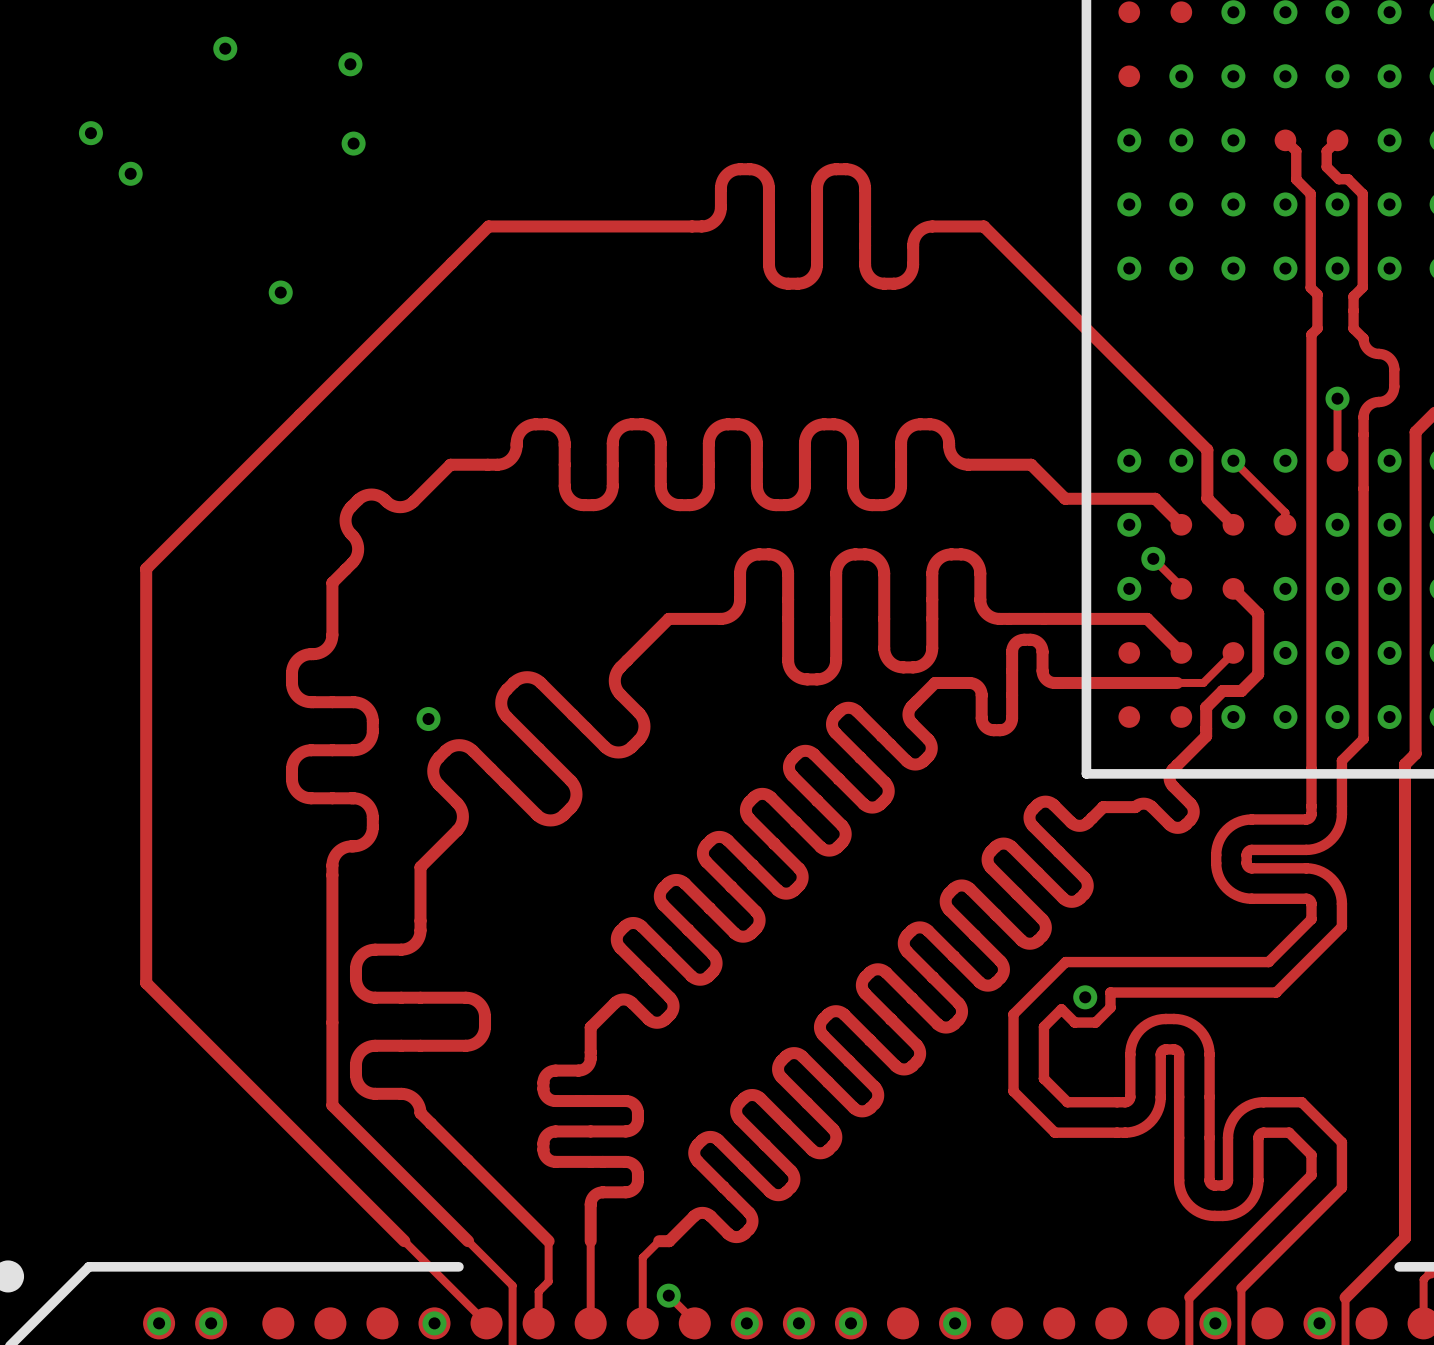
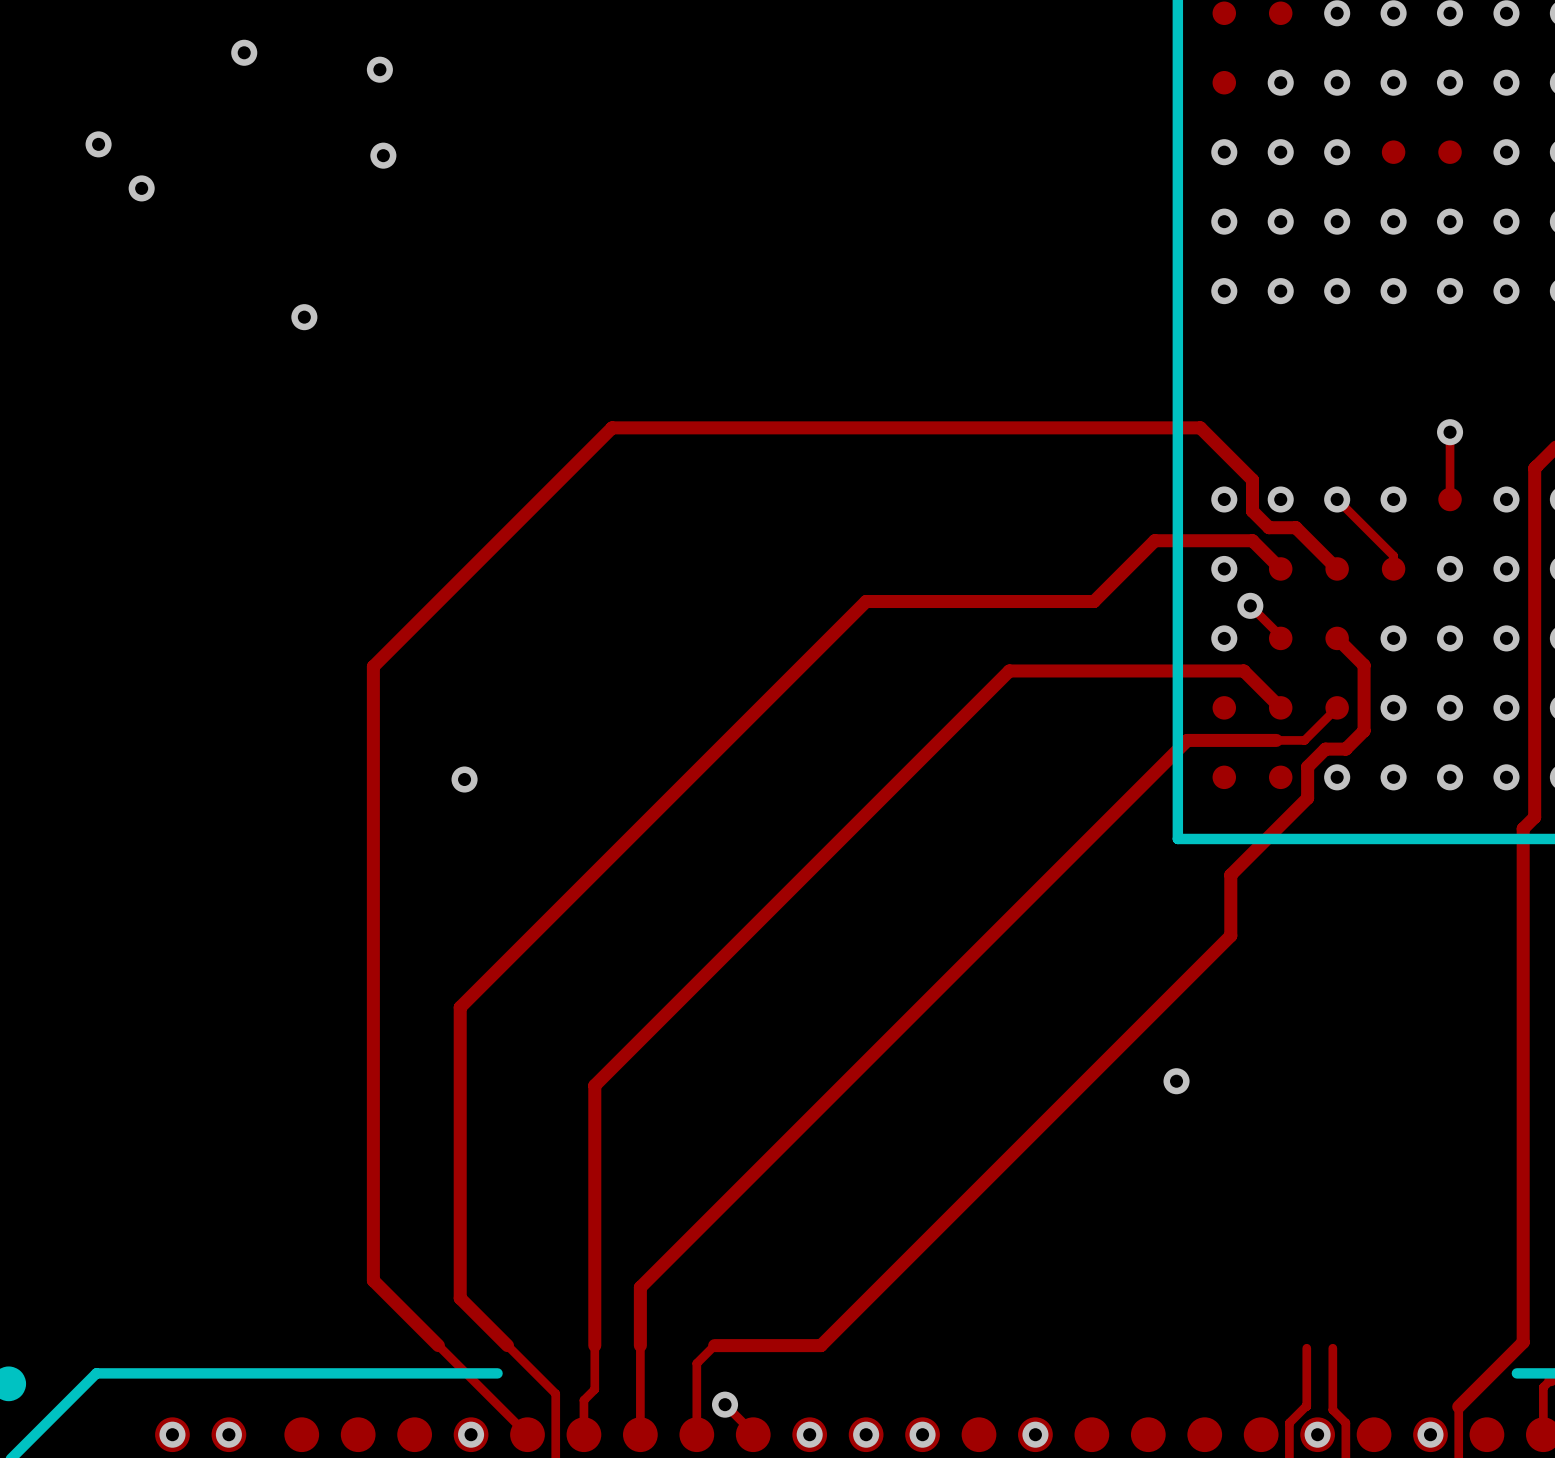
track: (1285, 140) (1296, 151) (1296, 179) (1310, 193) (1310, 287) (1317, 294) (1317, 328) (1311, 334) (1311, 814) (1306, 819) (1251, 819) (1236, 823) (1226, 829) (1219, 839) (1216, 851) (1216, 863) (1219, 878) (1232, 893) (1247, 898) (1308, 899) (1311, 902) (1311, 919) (1268, 962) (1065, 962) (1013, 1014) (1013, 1091) (1054, 1132) (1129, 1132) (1144, 1127) (1152, 1119) (1159, 1104) (1161, 1052) (1165, 1049) (1177, 1050) (1179, 1184) (1186, 1202) (1199, 1212) (1210, 1215) (1230, 1215) (1241, 1210) (1250, 1202) (1258, 1184) (1258, 1137) (1261, 1133) (1289, 1132) (1311, 1155) (1311, 1175) (1189, 1297) (1189, 1312) -> (1305, 1406) (1289, 1423)
track: (1337, 140) (1326, 151) (1326, 166) (1338, 179) (1347, 179) (1362, 193) (1362, 287) (1353, 296) (1353, 328) (1363, 338) (1368, 349) (1388, 357) (1392, 361) (1394, 369) (1392, 394) (1384, 400) (1369, 405) (1363, 415) (1363, 739) (1341, 760) (1341, 818) (1338, 829) (1331, 839) (1321, 846) (1310, 849) (1250, 850) (1246, 853) (1246, 863) (1251, 868) (1310, 868) (1325, 873) (1334, 881) (1339, 892) (1341, 926) (1276, 992) (1110, 992) (1110, 1007) (1095, 1022) (1074, 1022) (1061, 1009) (1043, 1026) (1043, 1078) (1067, 1102) (1128, 1100) (1131, 1046) (1138, 1032) (1146, 1024) (1161, 1019) (1177, 1019) (1189, 1022) (1199, 1029) (1206, 1039) (1209, 1050) (1209, 1180) (1213, 1185) (1223, 1185) (1227, 1182) (1230, 1126) (1238, 1112) (1251, 1104) (1263, 1102) (1301, 1102) (1341, 1142) (1341, 1187) (1241, 1288) (1241, 1312) -> (1332, 1348) (1332, 1409) (1345, 1423)
track: (1065, 498) (1031, 464) (968, 464) (960, 462) (951, 453) (948, 437) (943, 429) (934, 424) (920, 424) (910, 427) (902, 437) (900, 488) (898, 496) (886, 504) (865, 504) (857, 497) (853, 490) (853, 443) (851, 435) (840, 425) (824, 424) (812, 428) (806, 437) (804, 488) (802, 496) (790, 504) (771, 504) (762, 499) (757, 490) (756, 443) (755, 435) (744, 425) (728, 424) (716, 428) (709, 437) (708, 488) (705, 496) (693, 504) (675, 504) (666, 499) (661, 490) (660, 443) (658, 435) (647, 425) (631, 424) (619, 428) (613, 437) (612, 488) (609, 496) (599, 504) (581, 505) (571, 500) (565, 490) (564, 441) (561, 433) (551, 425) (535, 424) (527, 426) (520, 431) (517, 439) (514, 453) (505, 462) (497, 464) (450, 464) (413, 501) (404, 506) (393, 506) (379, 496) (371, 494) (361, 497) (351, 506) (346, 514) (345, 522) (348, 530) (356, 541) (358, 551) (354, 560) (332, 582) (331, 641) (321, 652) (304, 655) (297, 659) (292, 669) (292, 685) (297, 696) (306, 701) (355, 702) (363, 705) (372, 717) (372, 735) (367, 744) (357, 749) (309, 750) (300, 753) (293, 763) (292, 781) (296, 791) (304, 797) (357, 798) (367, 803) (371, 811) (372, 829) (368, 839) (359, 845) (341, 849) (335, 855) (332, 863) (332, 1105) (424, 1197) -> (1154, 540) (1094, 601) (866, 601) (460, 1007) (460, 1298)
track: (1207, 498) (1207, 449) (983, 226) (932, 226) (924, 228) (914, 239) (912, 268) (907, 278) (898, 283) (884, 283) (870, 278) (865, 266) (864, 184) (860, 176) (852, 170) (829, 170) (818, 180) (817, 188) (816, 268) (809, 279) (799, 283) (779, 281) (770, 270) (768, 186) (764, 176) (754, 169) (735, 169) (725, 176) (721, 186) (719, 213) (713, 222) (705, 225) (488, 226) (146, 568) (146, 982) (344, 1181) -> (1308, 540) (1295, 527) (1269, 527) (1252, 511) (1252, 479) (1200, 427) (612, 427) (373, 666) (373, 1280)
track: (999, 618) (989, 615) (982, 608) (980, 571) (974, 560) (963, 554) (943, 556) (935, 563) (932, 571) (932, 648) (930, 656) (925, 663) (917, 666) (895, 665) (887, 658) (884, 650) (884, 573) (882, 565) (871, 555) (849, 555) (840, 561) (836, 571) (835, 666) (830, 673) (823, 678) (803, 678) (792, 672) (788, 662) (787, 567) (782, 560) (775, 555) (754, 554) (747, 558) (741, 567) (739, 603) (732, 614) (722, 618) (668, 618) (617, 670) (614, 680) (616, 689) (640, 714) (644, 724) (641, 736) (628, 749) (618, 752) (606, 748) (535, 679) (520, 678) (505, 691) (501, 703) (505, 714) (574, 786) (576, 794) (574, 802) (560, 817) (550, 820) (538, 816) (467, 747) (452, 746) (437, 759) (433, 766) (434, 777) (460, 807) (462, 816) (461, 824) (420, 867) (420, 930) (417, 940) (405, 949) (373, 949) (364, 952) (356, 964) (356, 982) (363, 993) (373, 997) (472, 998) (479, 1003) (483, 1010) (484, 1030) (479, 1040) (467, 1045) (368, 1046) (361, 1051) (357, 1058) (356, 1078) (360, 1086) (368, 1092) (403, 1093) (413, 1098) (418, 1104) (420, 1113) (548, 1241) -> (1083, 670) (1009, 670) (594, 1085) (594, 1345)
track: (1095, 682) (1048, 681) (1042, 673) (1042, 650) (1040, 644) (1031, 639) (1019, 640) (1014, 644) (1012, 650) (1012, 718) (1009, 725) (1003, 729) (993, 730) (984, 725) (981, 719) (981, 692) (975, 684) (935, 682) (912, 706) (908, 711) (910, 721) (929, 740) (931, 746) (929, 755) (916, 764) (907, 761) (855, 710) (850, 707) (842, 709) (833, 718) (833, 729) (886, 783) (888, 791) (885, 799) (876, 806) (865, 805) (812, 753) (807, 750) (800, 751) (790, 762) (790, 772) (843, 826) (845, 835) (842, 842) (833, 849) (822, 848) (770, 797) (762, 793) (756, 795) (748, 802) (746, 814) (800, 870) (801, 881) (794, 890) (787, 893) (778, 891) (724, 838) (712, 838) (703, 850) (705, 860) (757, 913) (758, 924) (751, 933) (744, 936) (735, 934) (680, 880) (670, 881) (661, 891) (659, 897) (662, 904) (714, 956) (715, 967) (708, 976) (701, 979) (692, 977) (639, 924) (630, 923) (620, 930) (616, 938) (618, 945) (670, 998) (673, 1007) (670, 1013) (664, 1020) (655, 1022) (649, 1020) (630, 1001) (618, 1000) (590, 1027) (590, 1060) (587, 1067) (580, 1070) (552, 1071) (544, 1078) (544, 1093) (552, 1100) (627, 1101) (633, 1103) (637, 1108) (637, 1123) (628, 1131) (554, 1131) (548, 1133) (544, 1138) (544, 1154) (552, 1161) (625, 1161) (635, 1166) (637, 1181) (633, 1189) (627, 1192) (598, 1193) (592, 1198) (590, 1204) -> (1187, 740) (640, 1287) (640, 1305)
track: (1173, 769) (1169, 776) (1171, 783) (1191, 804) (1193, 810) (1191, 819) (1180, 827) (1171, 826) (1150, 806) (1145, 803) (1135, 807) (1103, 807) (1086, 823) (1079, 825) (1072, 823) (1050, 802) (1042, 801) (1037, 805) (1029, 814) (1031, 823) (1085, 878) (1087, 885) (1085, 893) (1076, 900) (1065, 900) (1010, 845) (1003, 843) (996, 845) (988, 855) (988, 864) (1043, 920) (1045, 927) (1043, 934) (1034, 942) (1023, 942) (968, 887) (961, 885) (954, 887) (946, 897) (946, 906) (1001, 962) (1003, 969) (1001, 976) (992, 984) (981, 984) (927, 929) (919, 927) (912, 929) (904, 938) (905, 949) (959, 1004) (962, 1011) (959, 1018) (950, 1026) (940, 1025) (885, 971) (877, 969) (870, 971) (862, 981) (863, 990) (917, 1046) (920, 1053) (917, 1060) (908, 1068) (898, 1067) (843, 1013) (835, 1011) (828, 1013) (820, 1023) (821, 1032) (875, 1088) (878, 1095) (875, 1102) (866, 1110) (856, 1109) (801, 1055) (794, 1053) (786, 1055) (778, 1065) (779, 1074) (833, 1130) (836, 1135) (834, 1143) (824, 1152) (814, 1151) (759, 1097) (753, 1095) (746, 1096) (737, 1105) (737, 1116) (791, 1171) (794, 1177) (792, 1185) (782, 1194) (772, 1193) (717, 1139) (711, 1137) (705, 1137) (695, 1148) (695, 1158) (750, 1213) (752, 1219) (751, 1225) (742, 1235) (733, 1236) (709, 1215) (700, 1212) (694, 1216) (669, 1241) -> (1271, 834) (1230, 875) (1230, 935) (820, 1345) (725, 1345)
track: none -> (1306, 1348) (1306, 1406)

